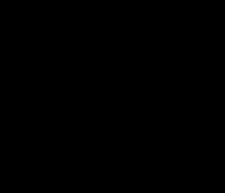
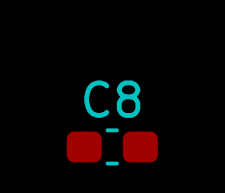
C8: none -> (112, 146)

